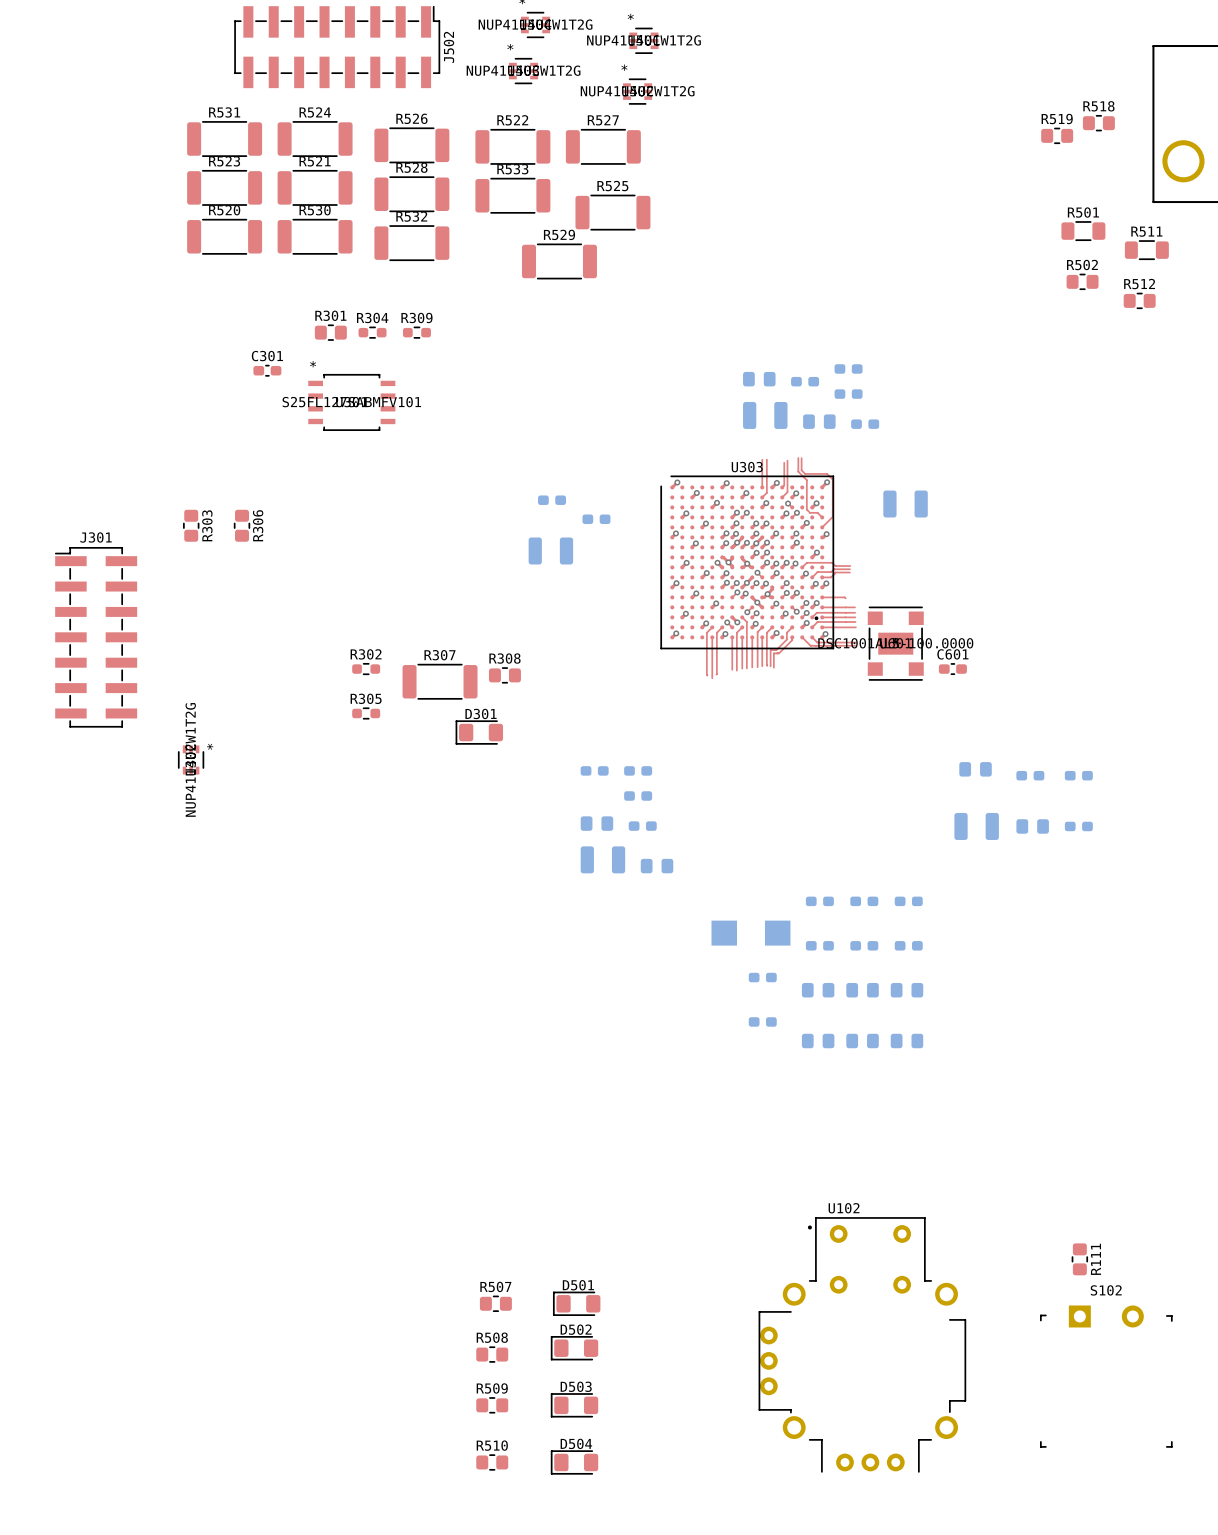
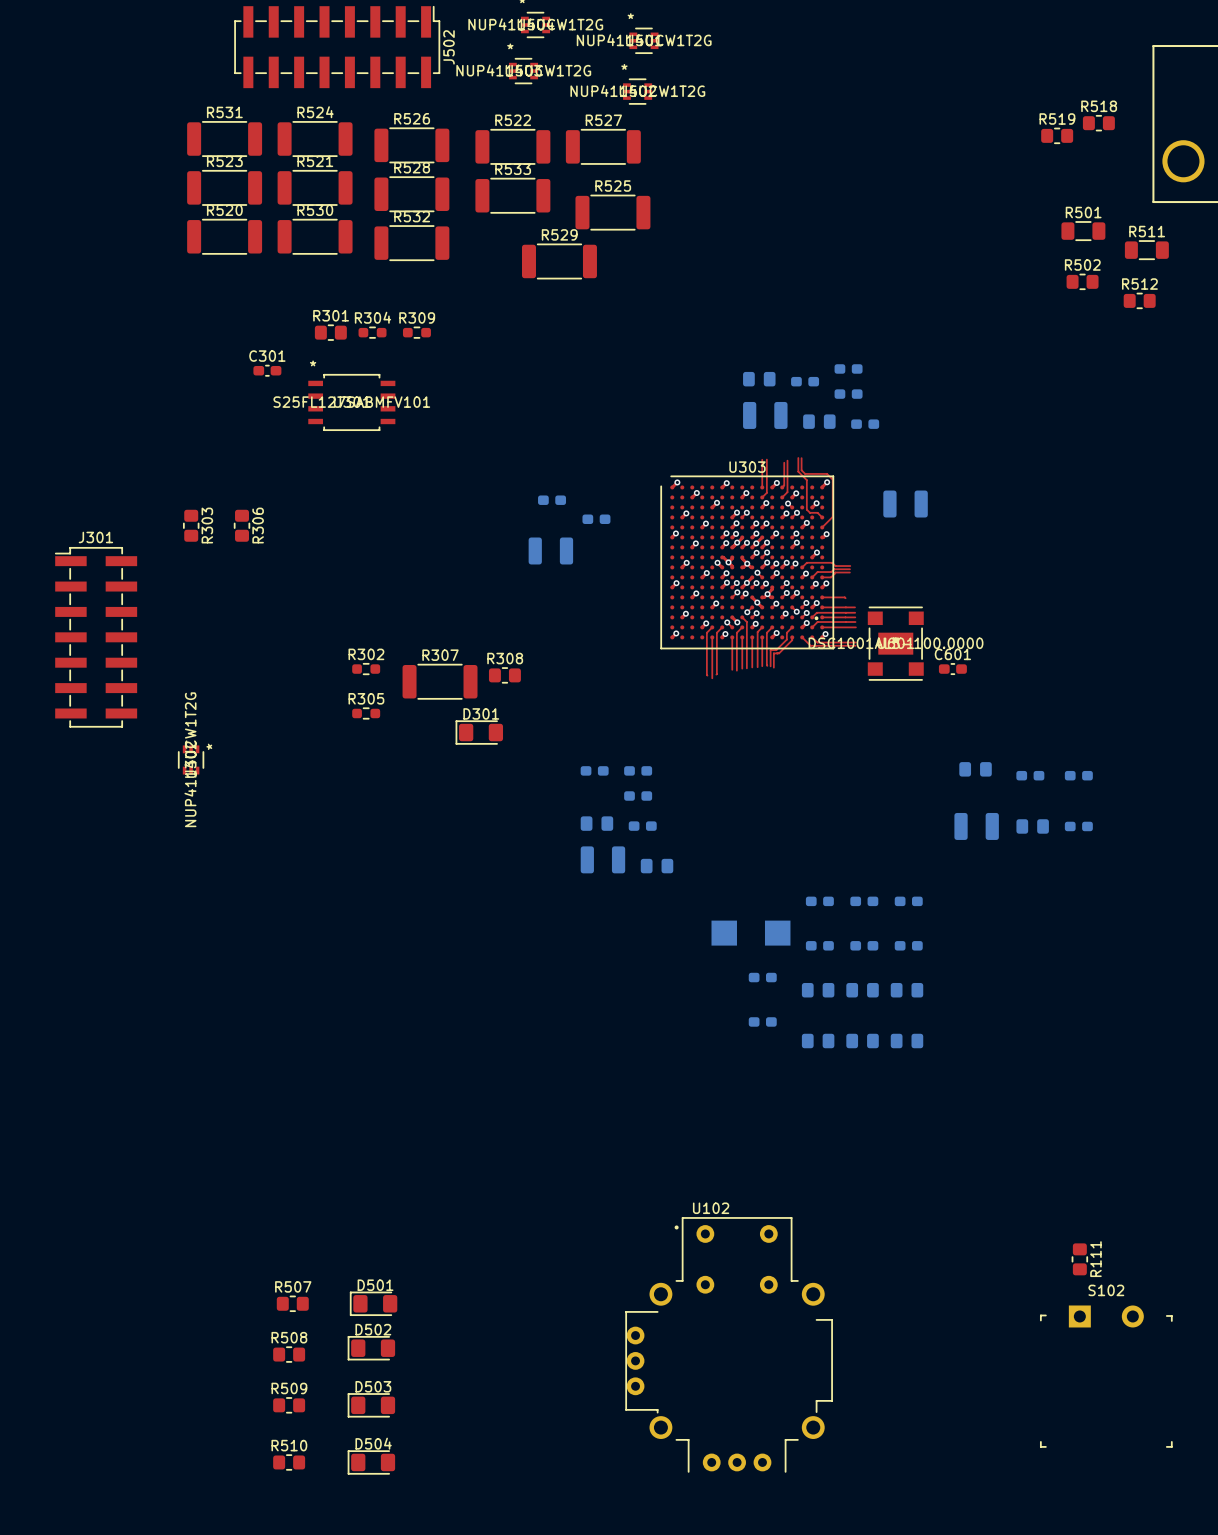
R507 position: (495, 1303) -> (292, 1303)
D501 position: (576, 1303) -> (373, 1303)
U102 position: (862, 1344) -> (729, 1344)
D502 position: (574, 1348) -> (371, 1348)
R508 position: (492, 1354) -> (289, 1354)
R509 position: (492, 1405) -> (289, 1405)
D503 position: (574, 1405) -> (371, 1405)
R510 position: (492, 1462) -> (289, 1462)
D504 position: (574, 1462) -> (371, 1462)

